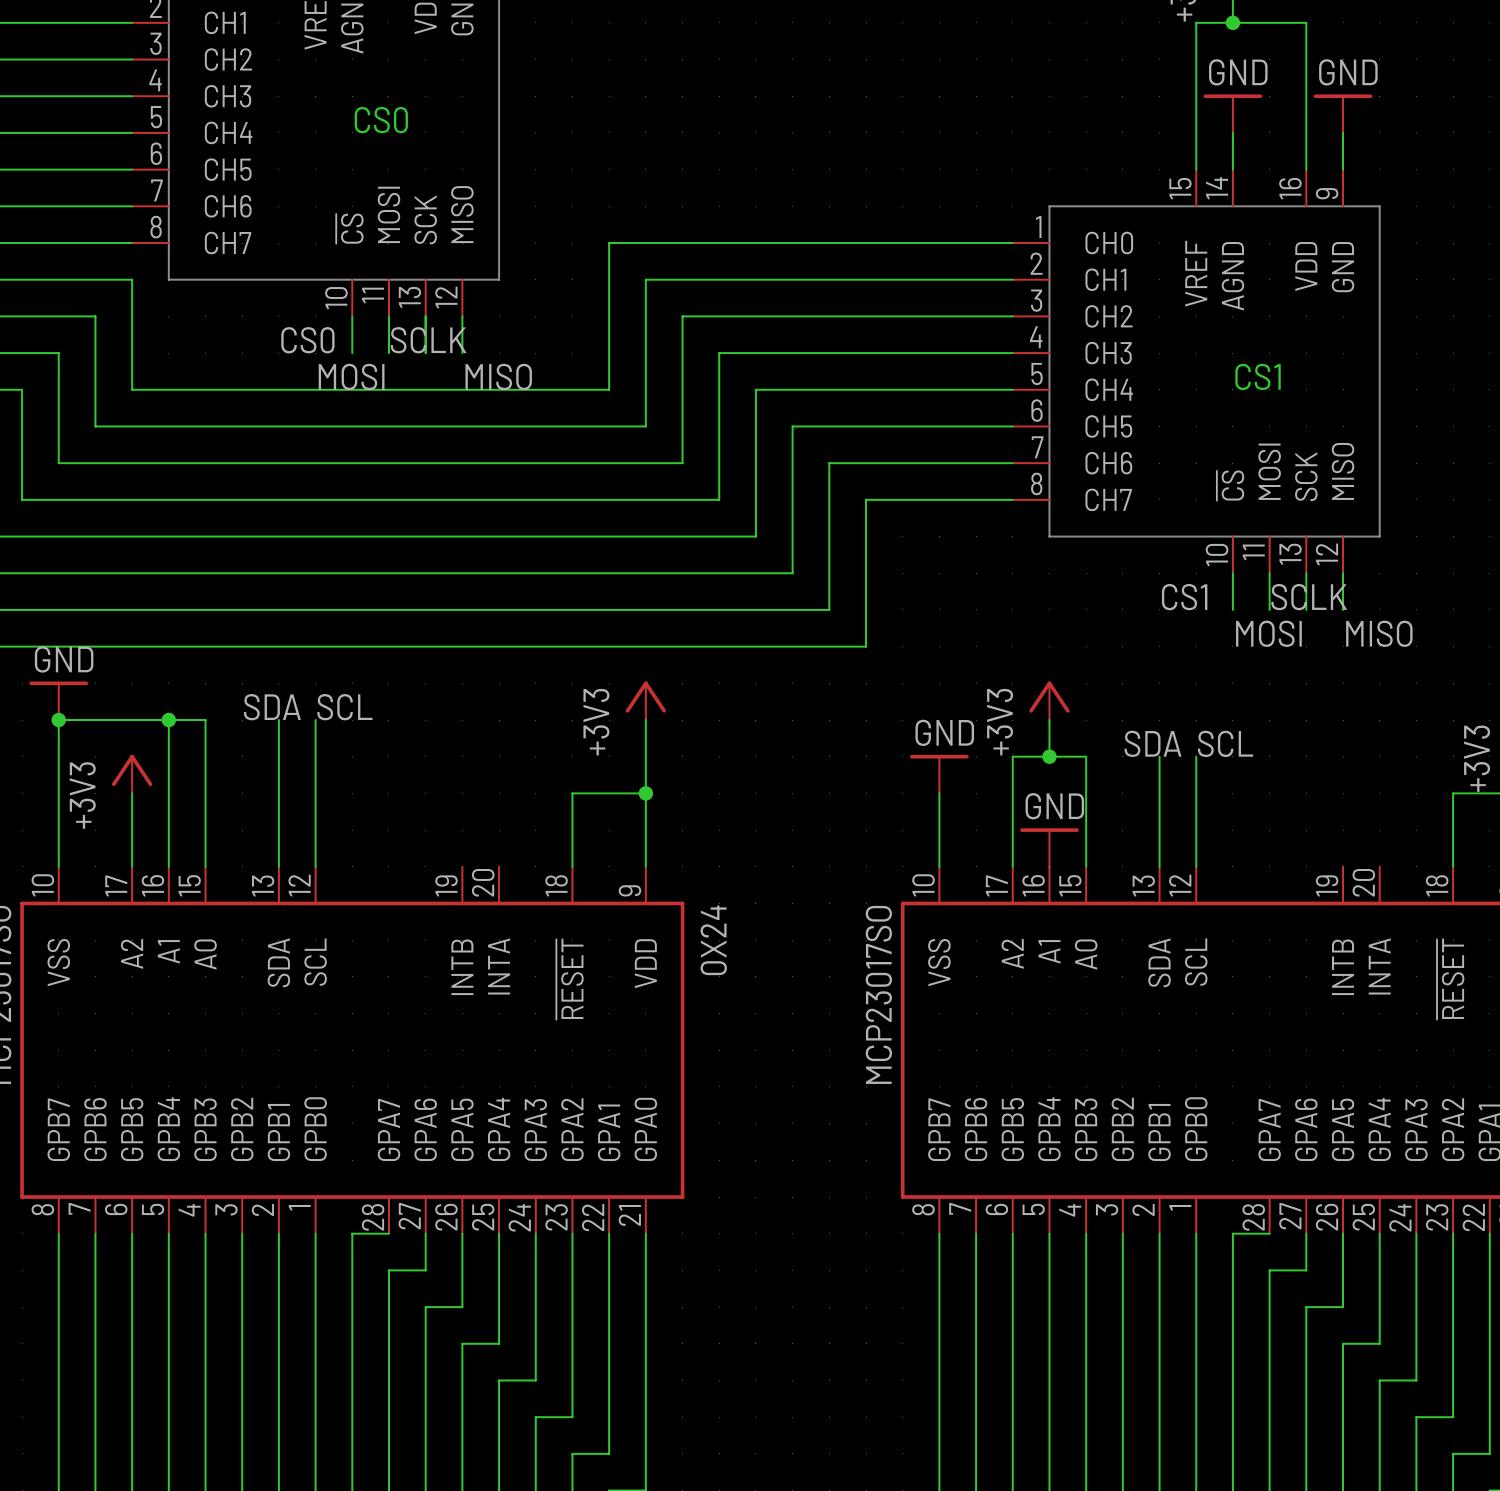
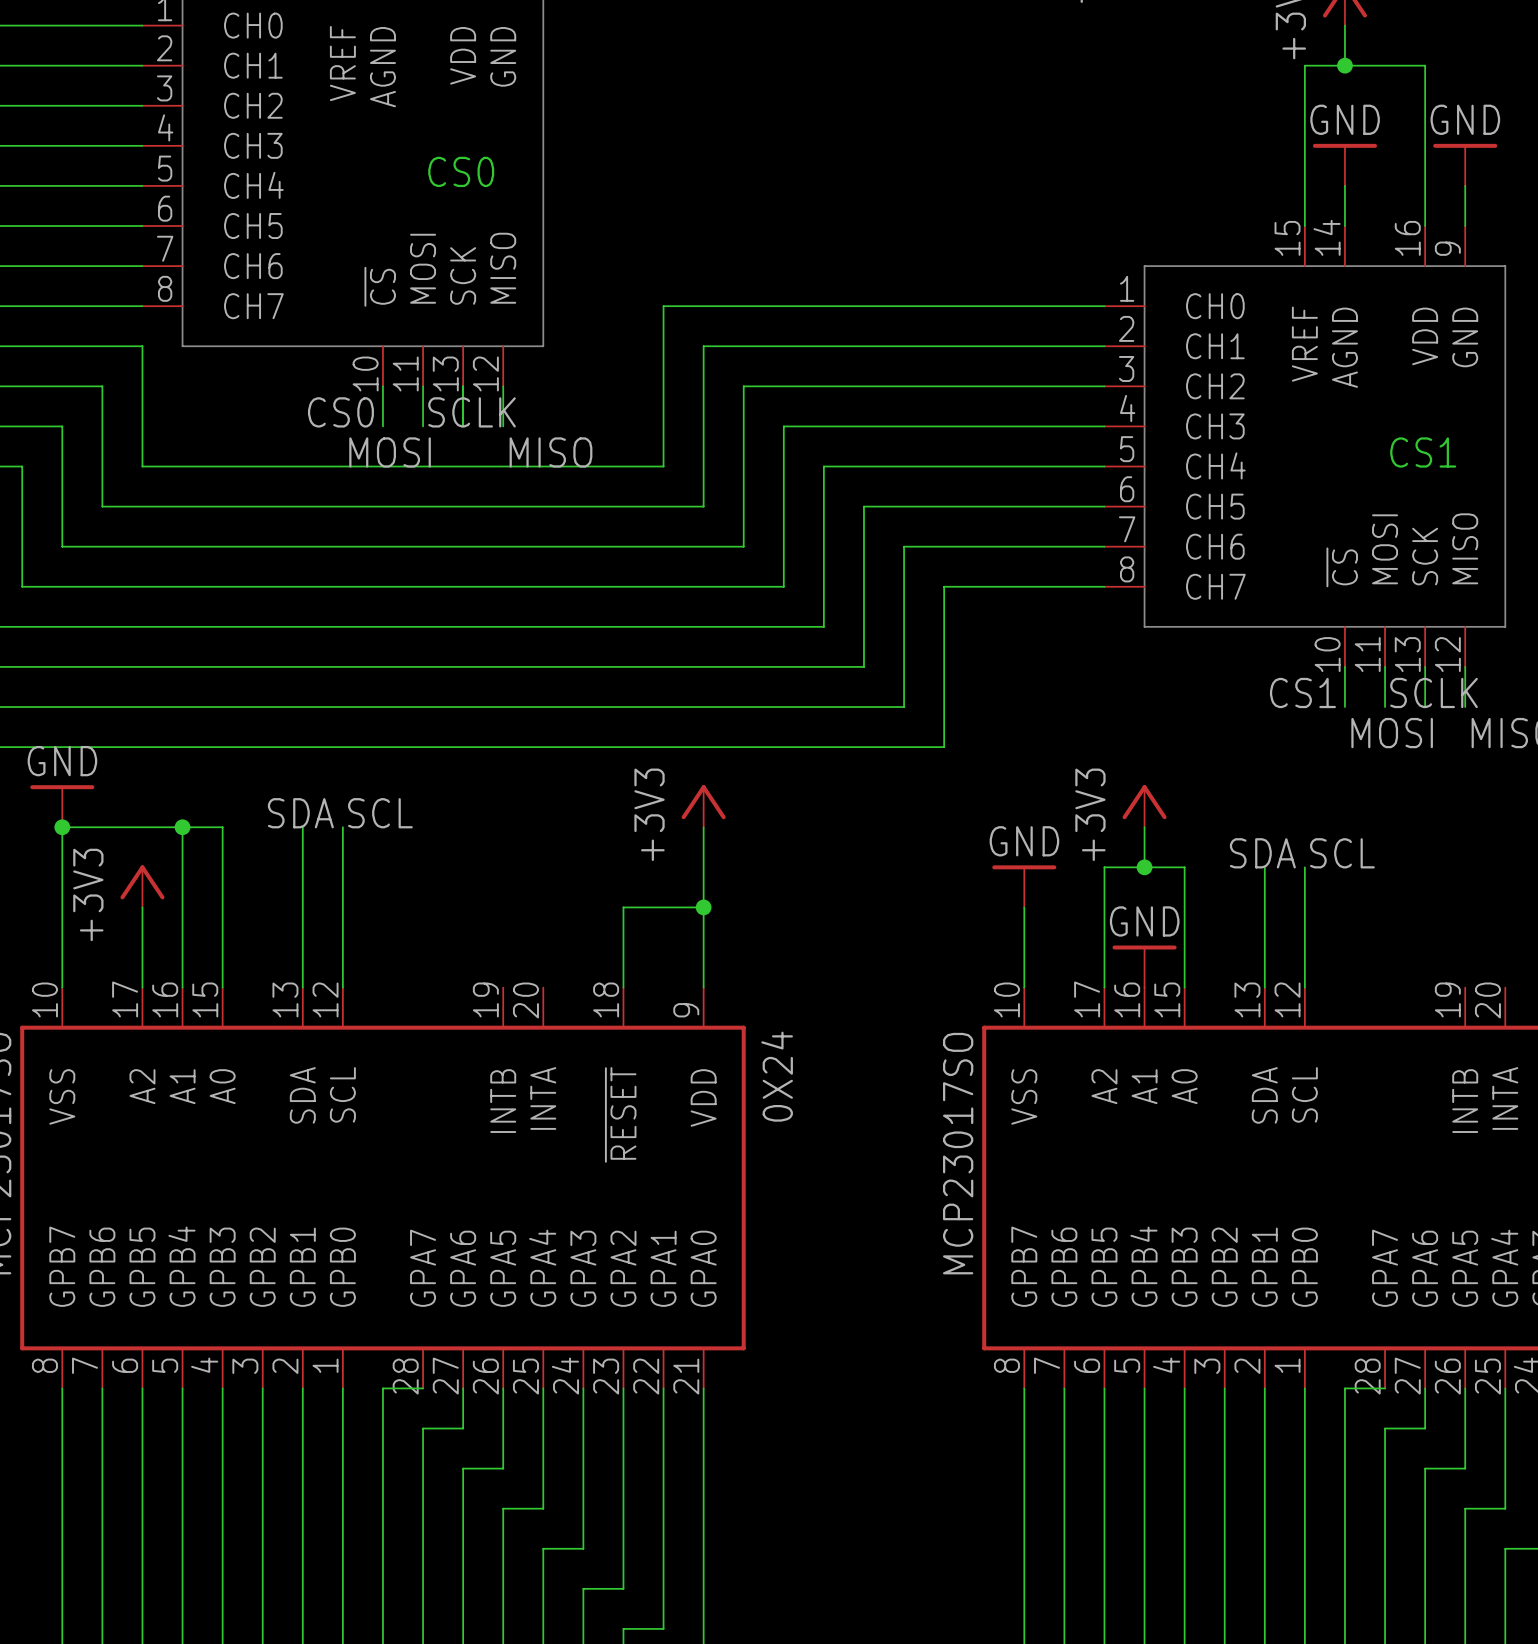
text position: CS0 (381, 120) -> CS0 (461, 171)
text position: CS1 (1258, 376) -> CS1 (1423, 452)

